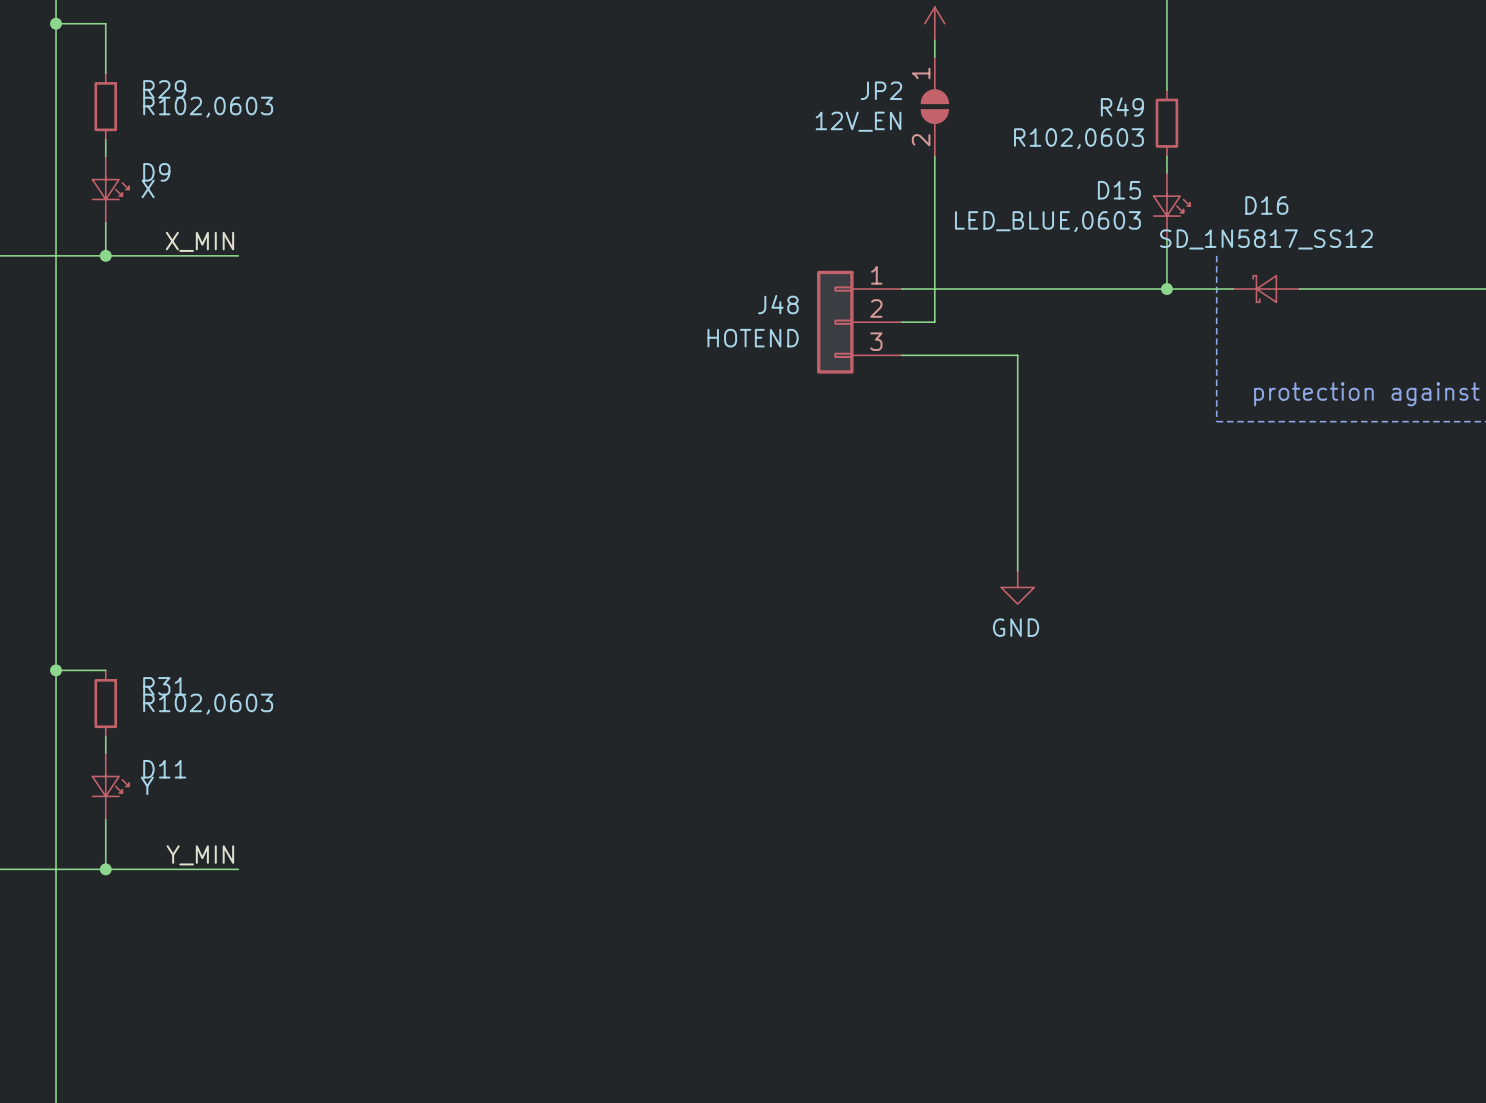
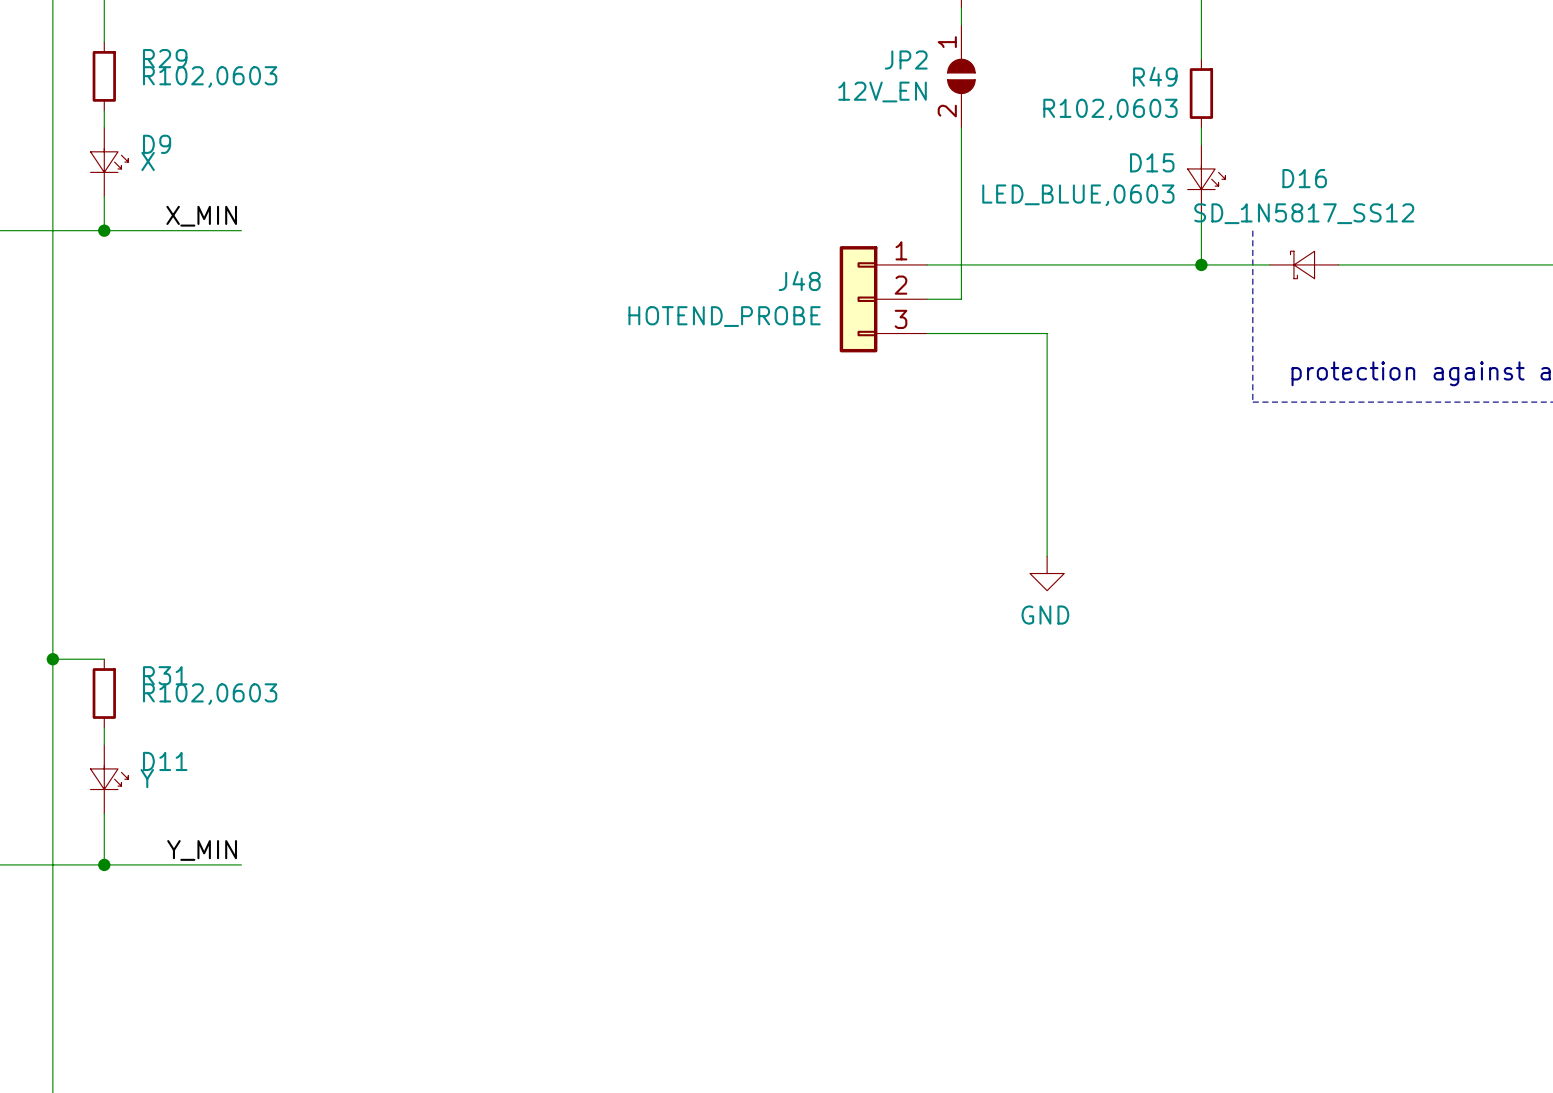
J48 value: HOTEND (753, 338) -> HOTEND_PROBE (724, 316)

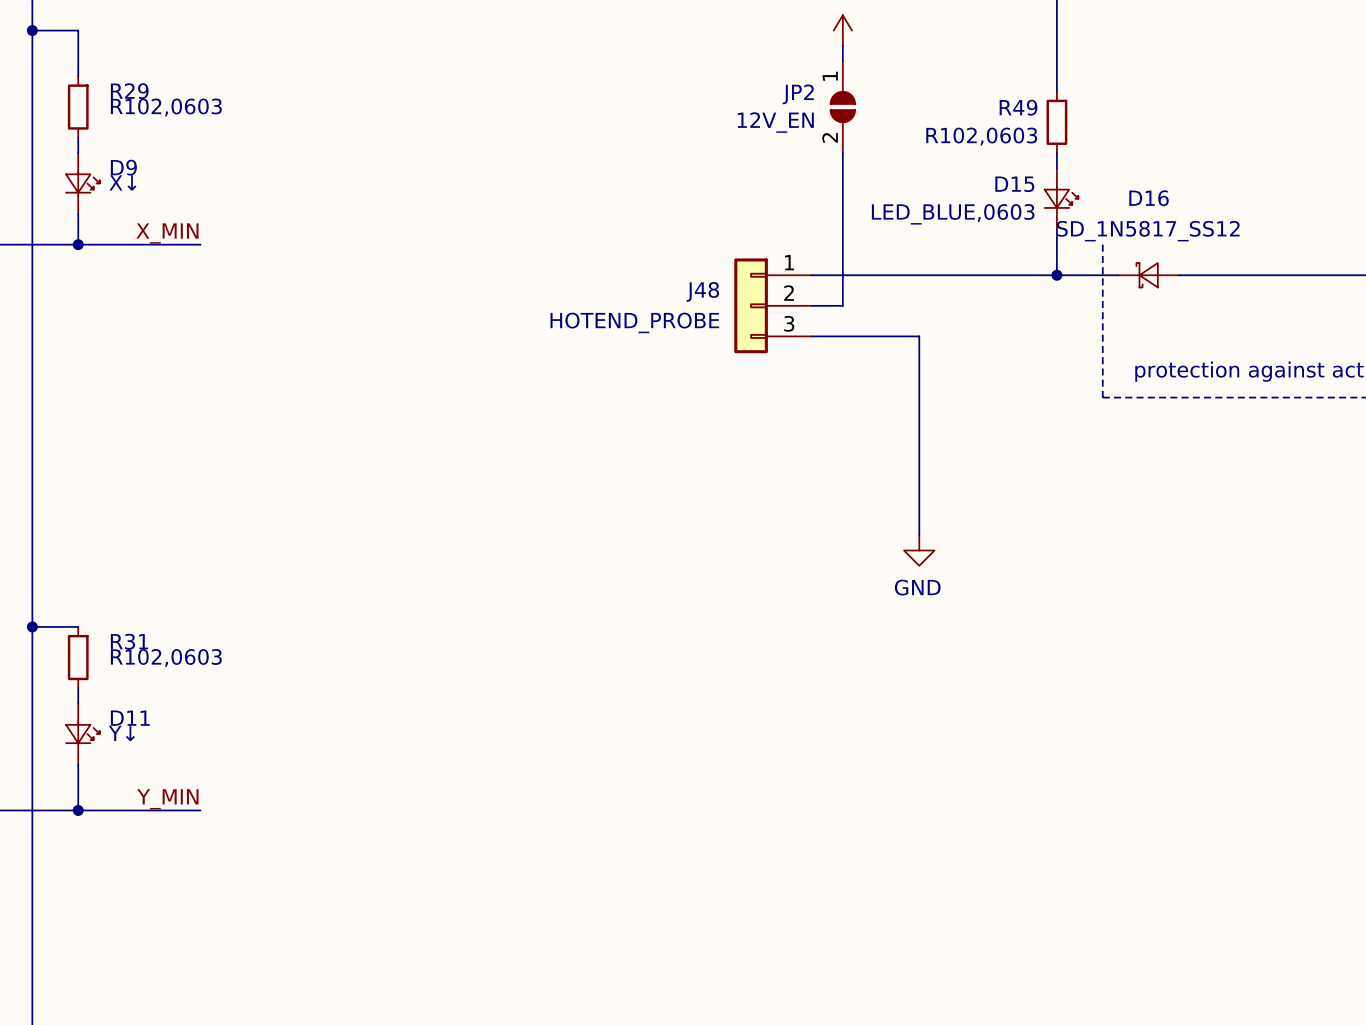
D9 value: X (148, 161) -> X↓ (122, 182)
D11 value: Y (147, 778) -> Y↓ (121, 733)

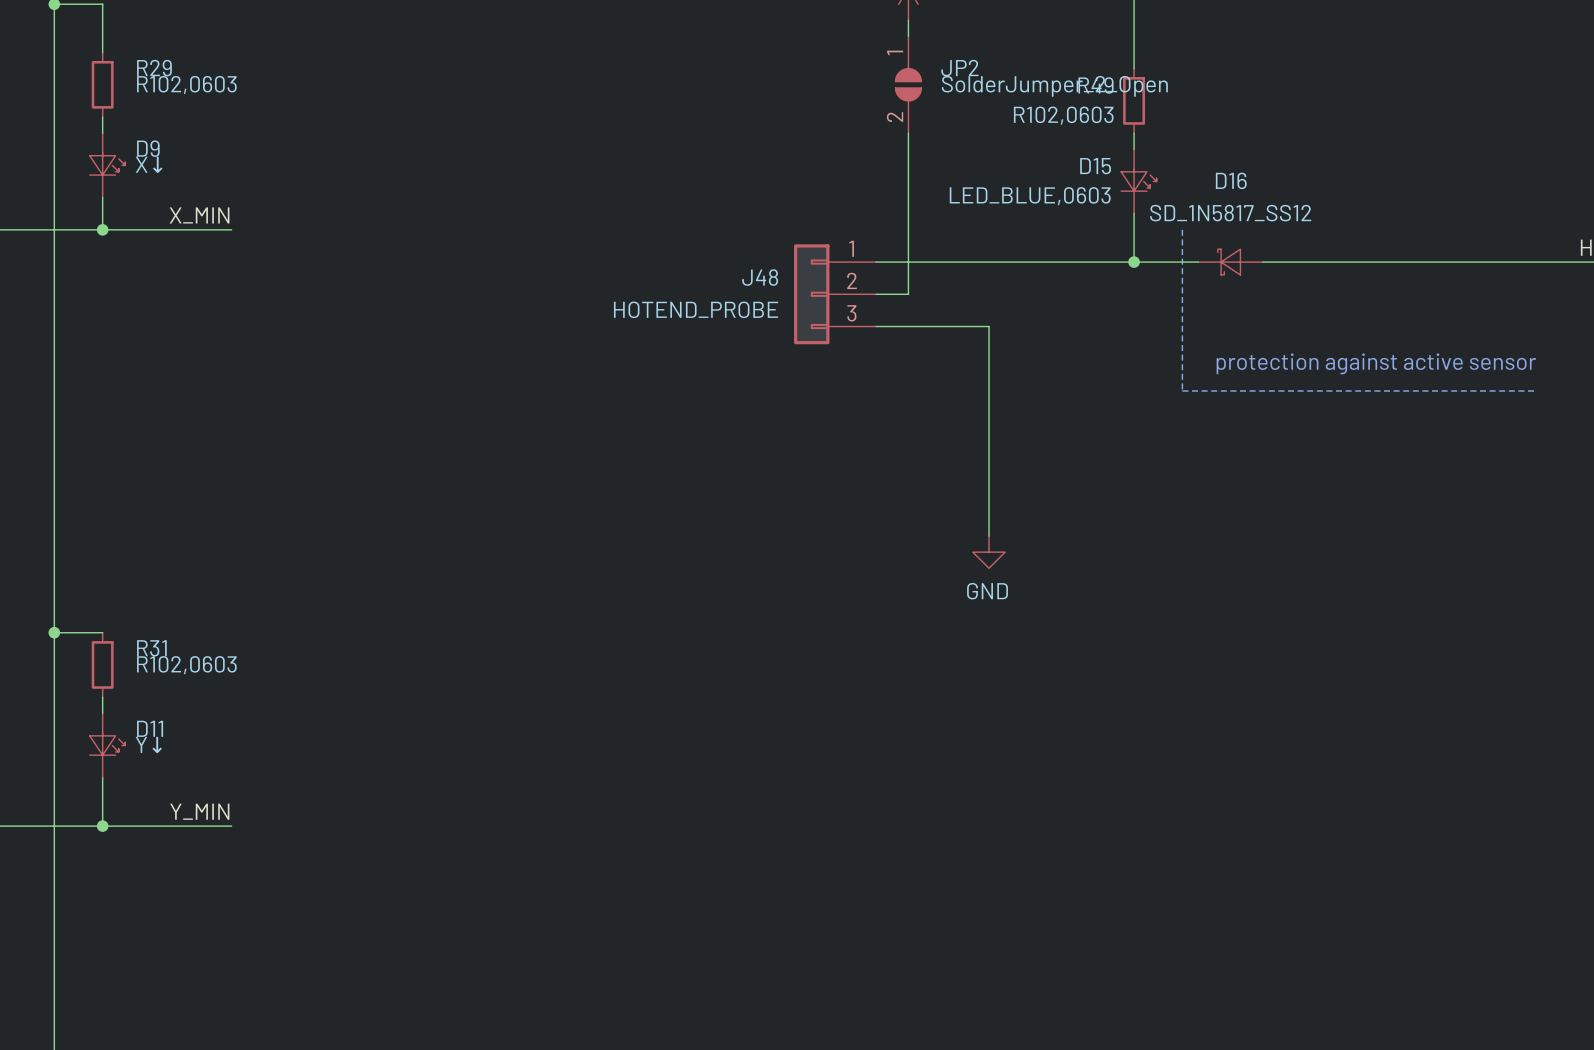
JP2 name position: JP2 (798, 94) -> JP2 (959, 68)
JP2 value: 12V_EN (775, 122) -> SolderJumper_2_Open (1054, 86)

